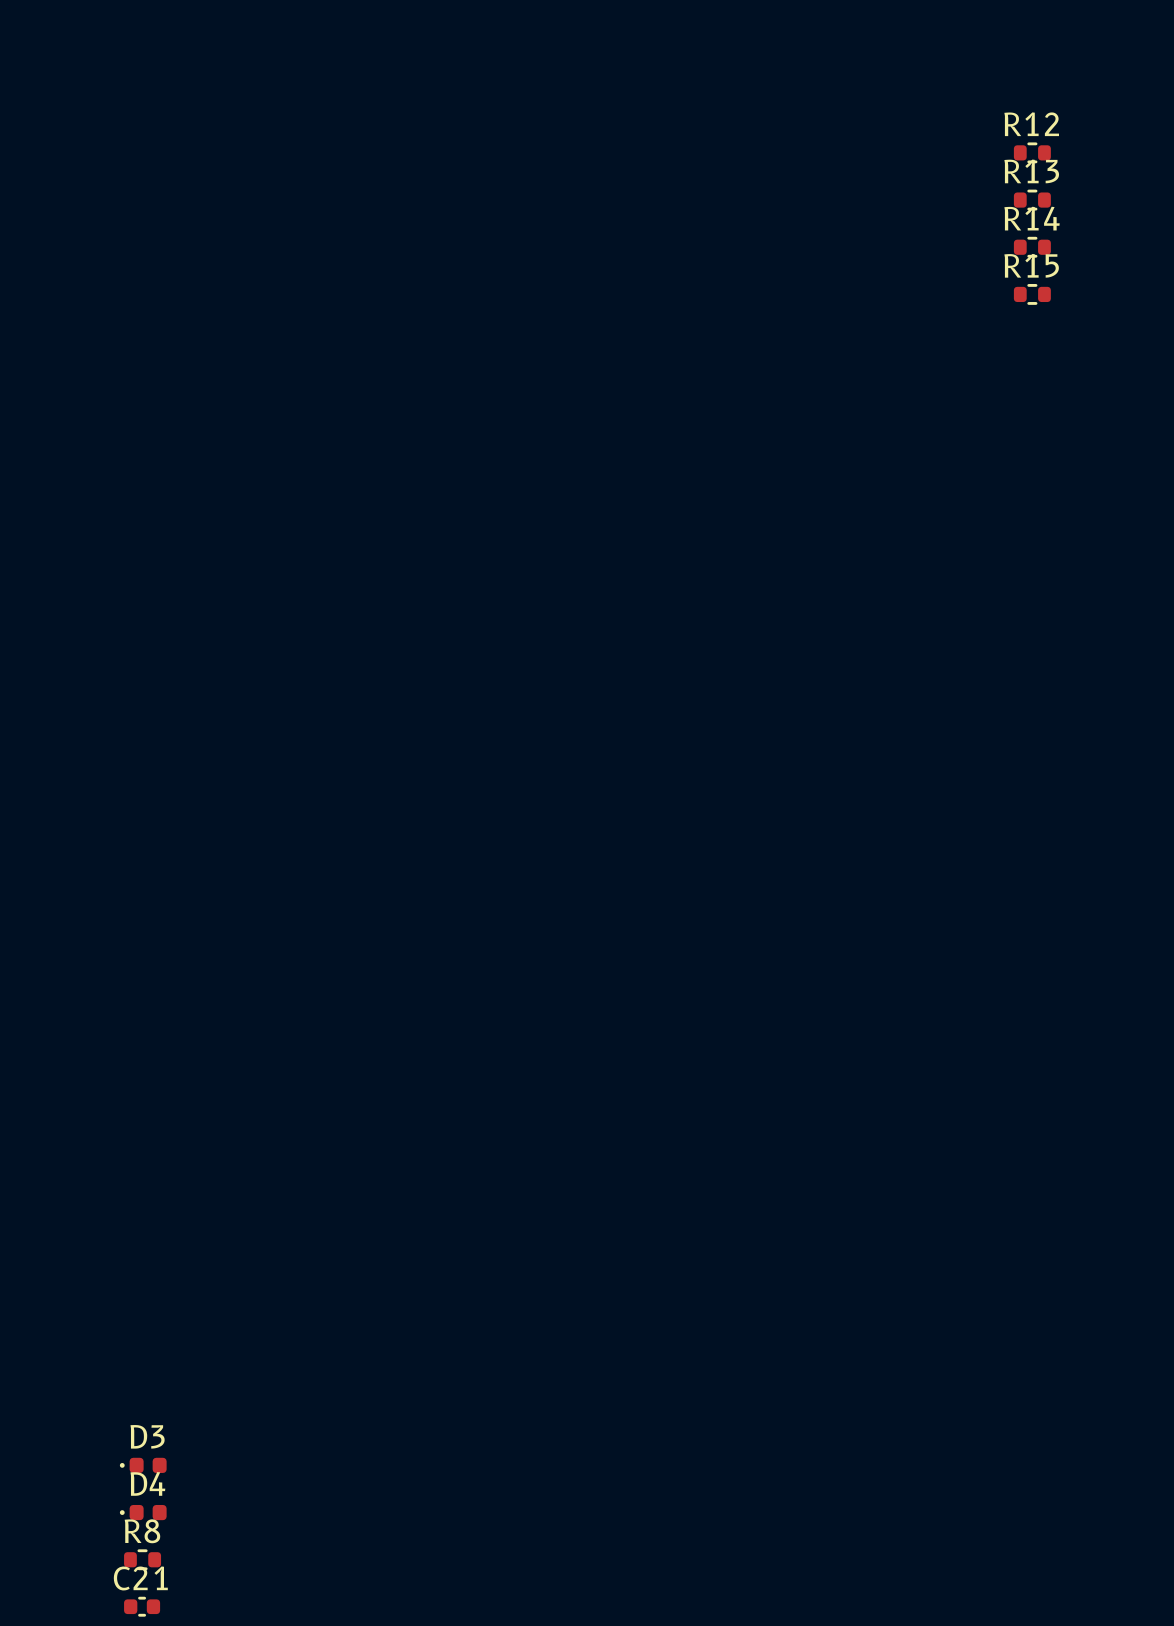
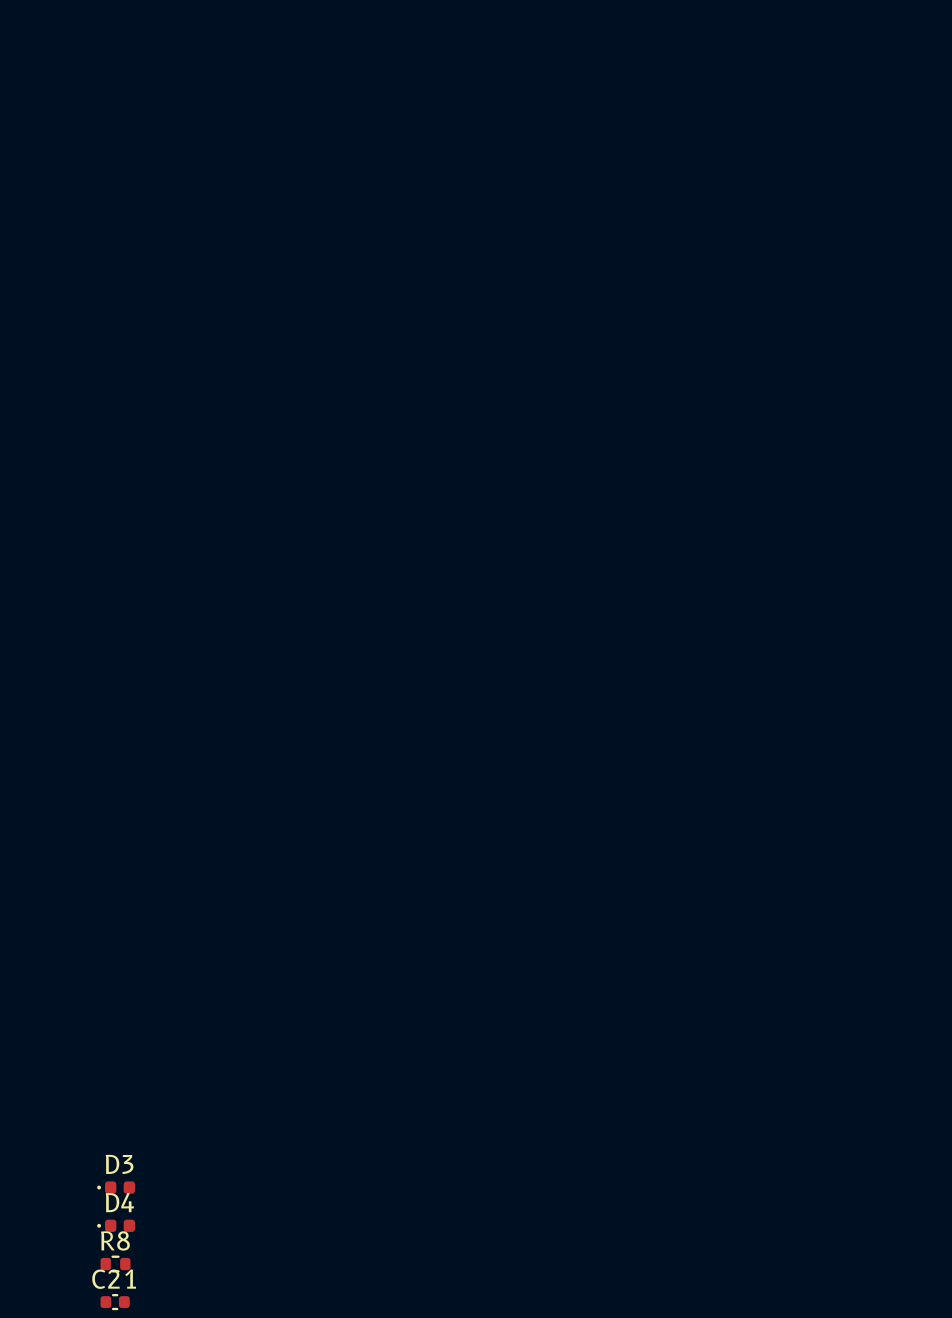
R12: (1032, 152) -> none
R13: (1032, 200) -> none
R14: (1032, 247) -> none
R15: (1032, 294) -> none

